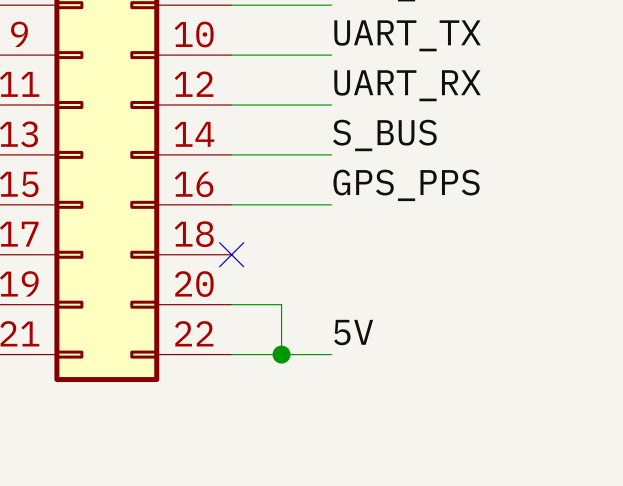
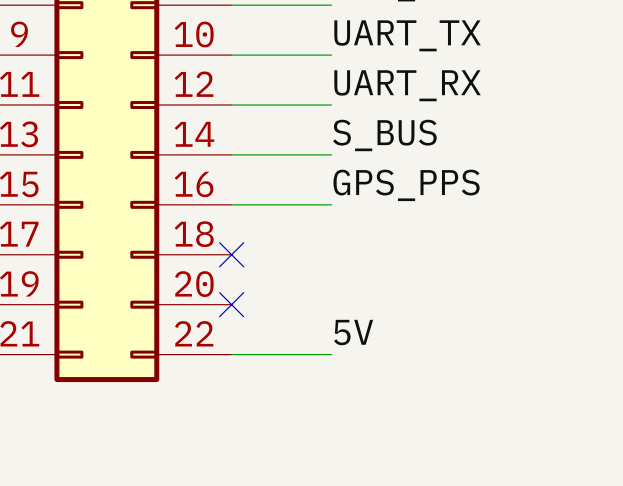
wire: (231, 304) (281, 304) (281, 354) -> none
no-connect mark: none -> (231, 304)
junction: (281, 354) -> none

